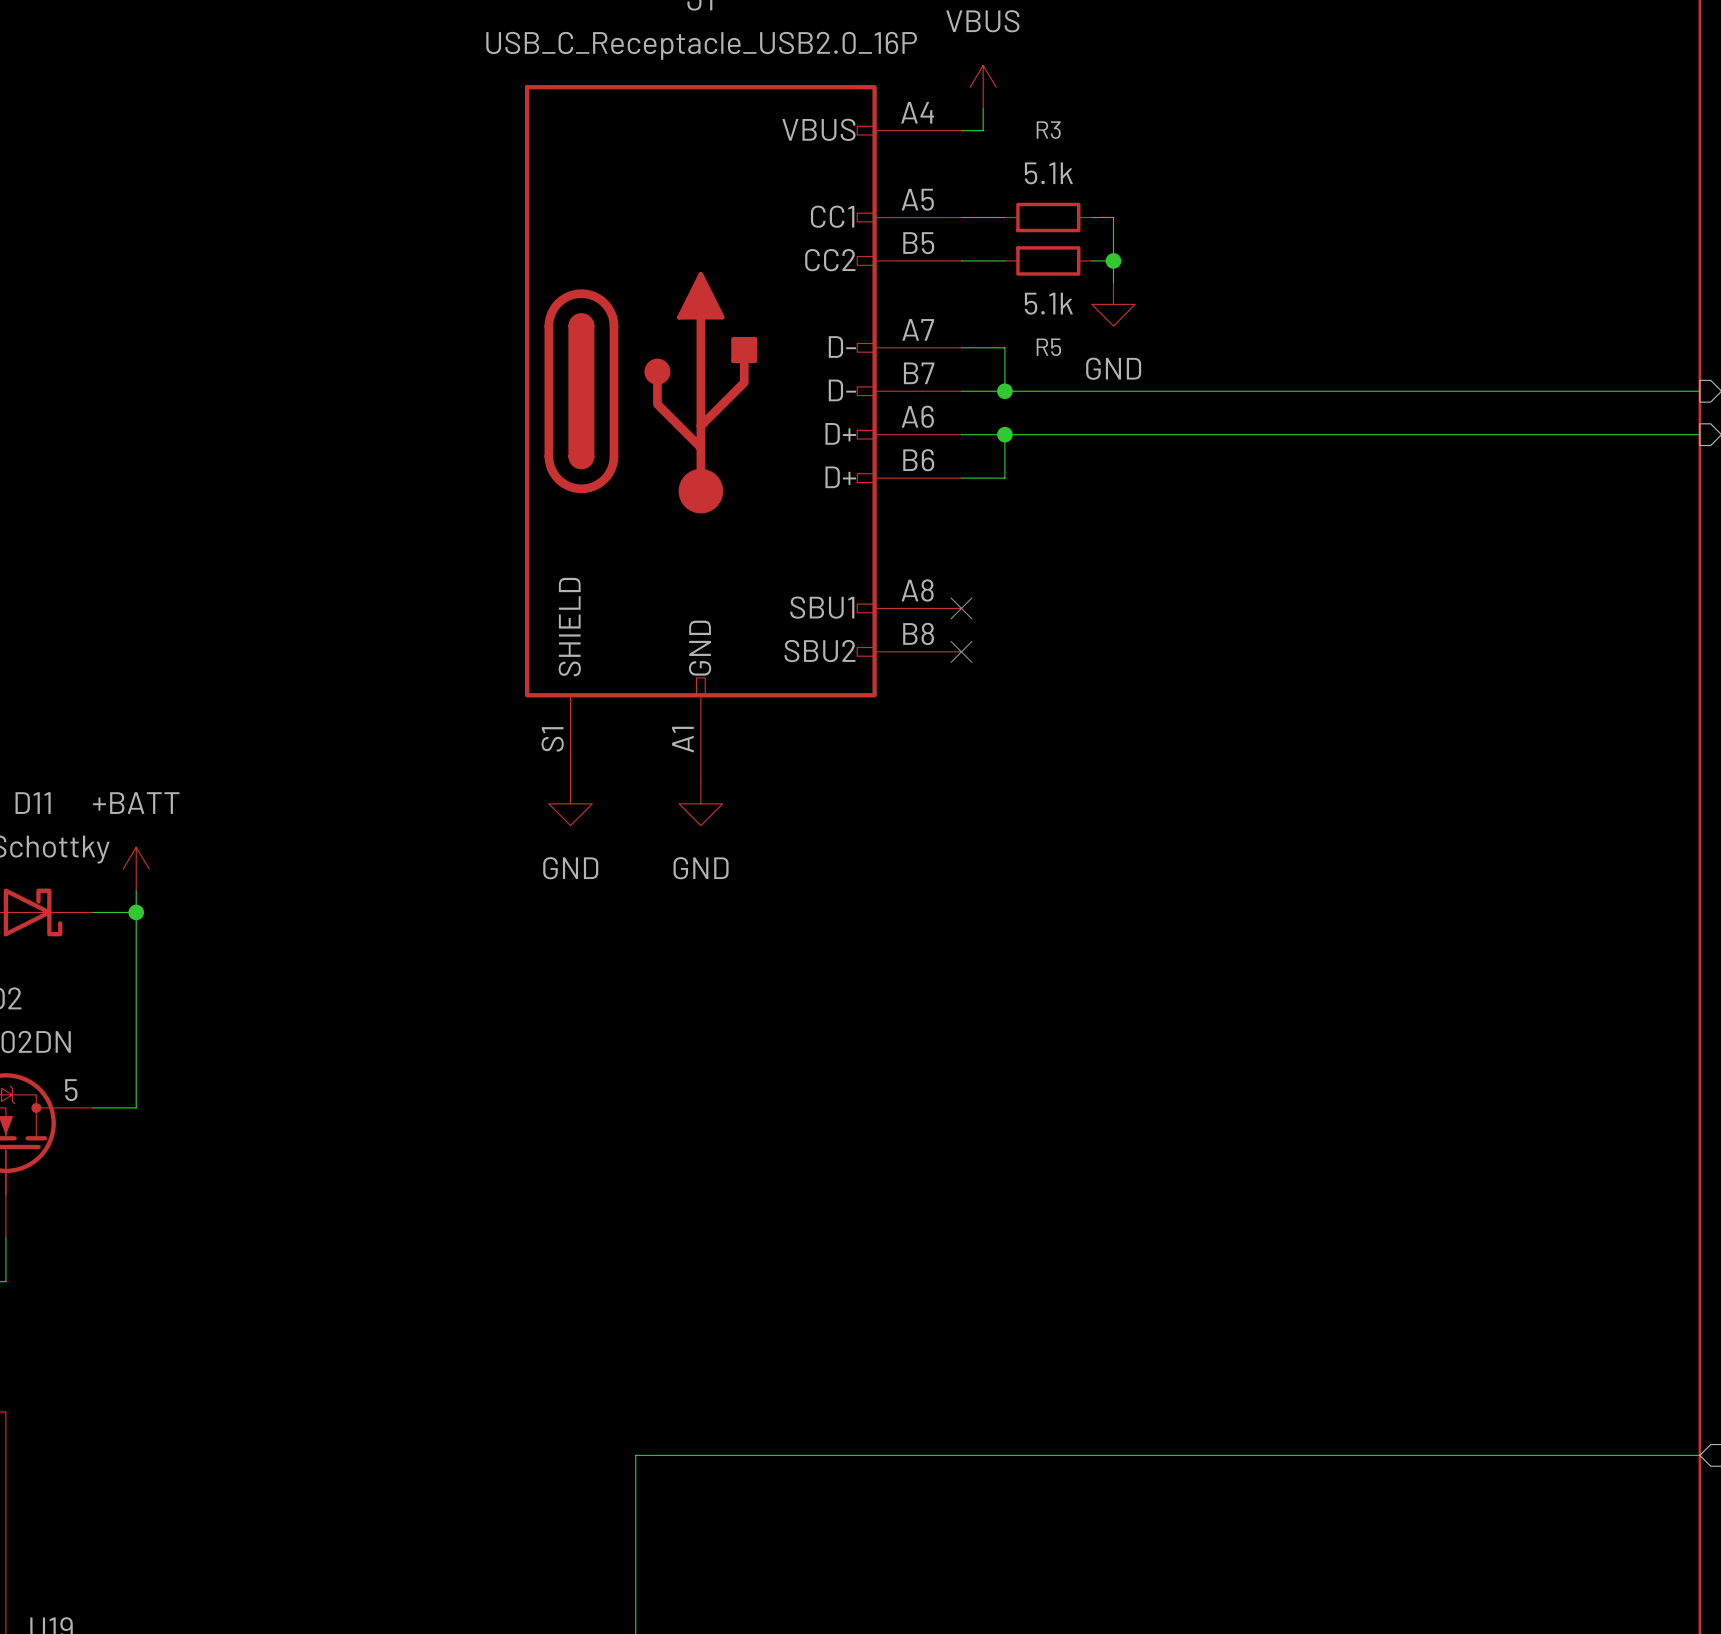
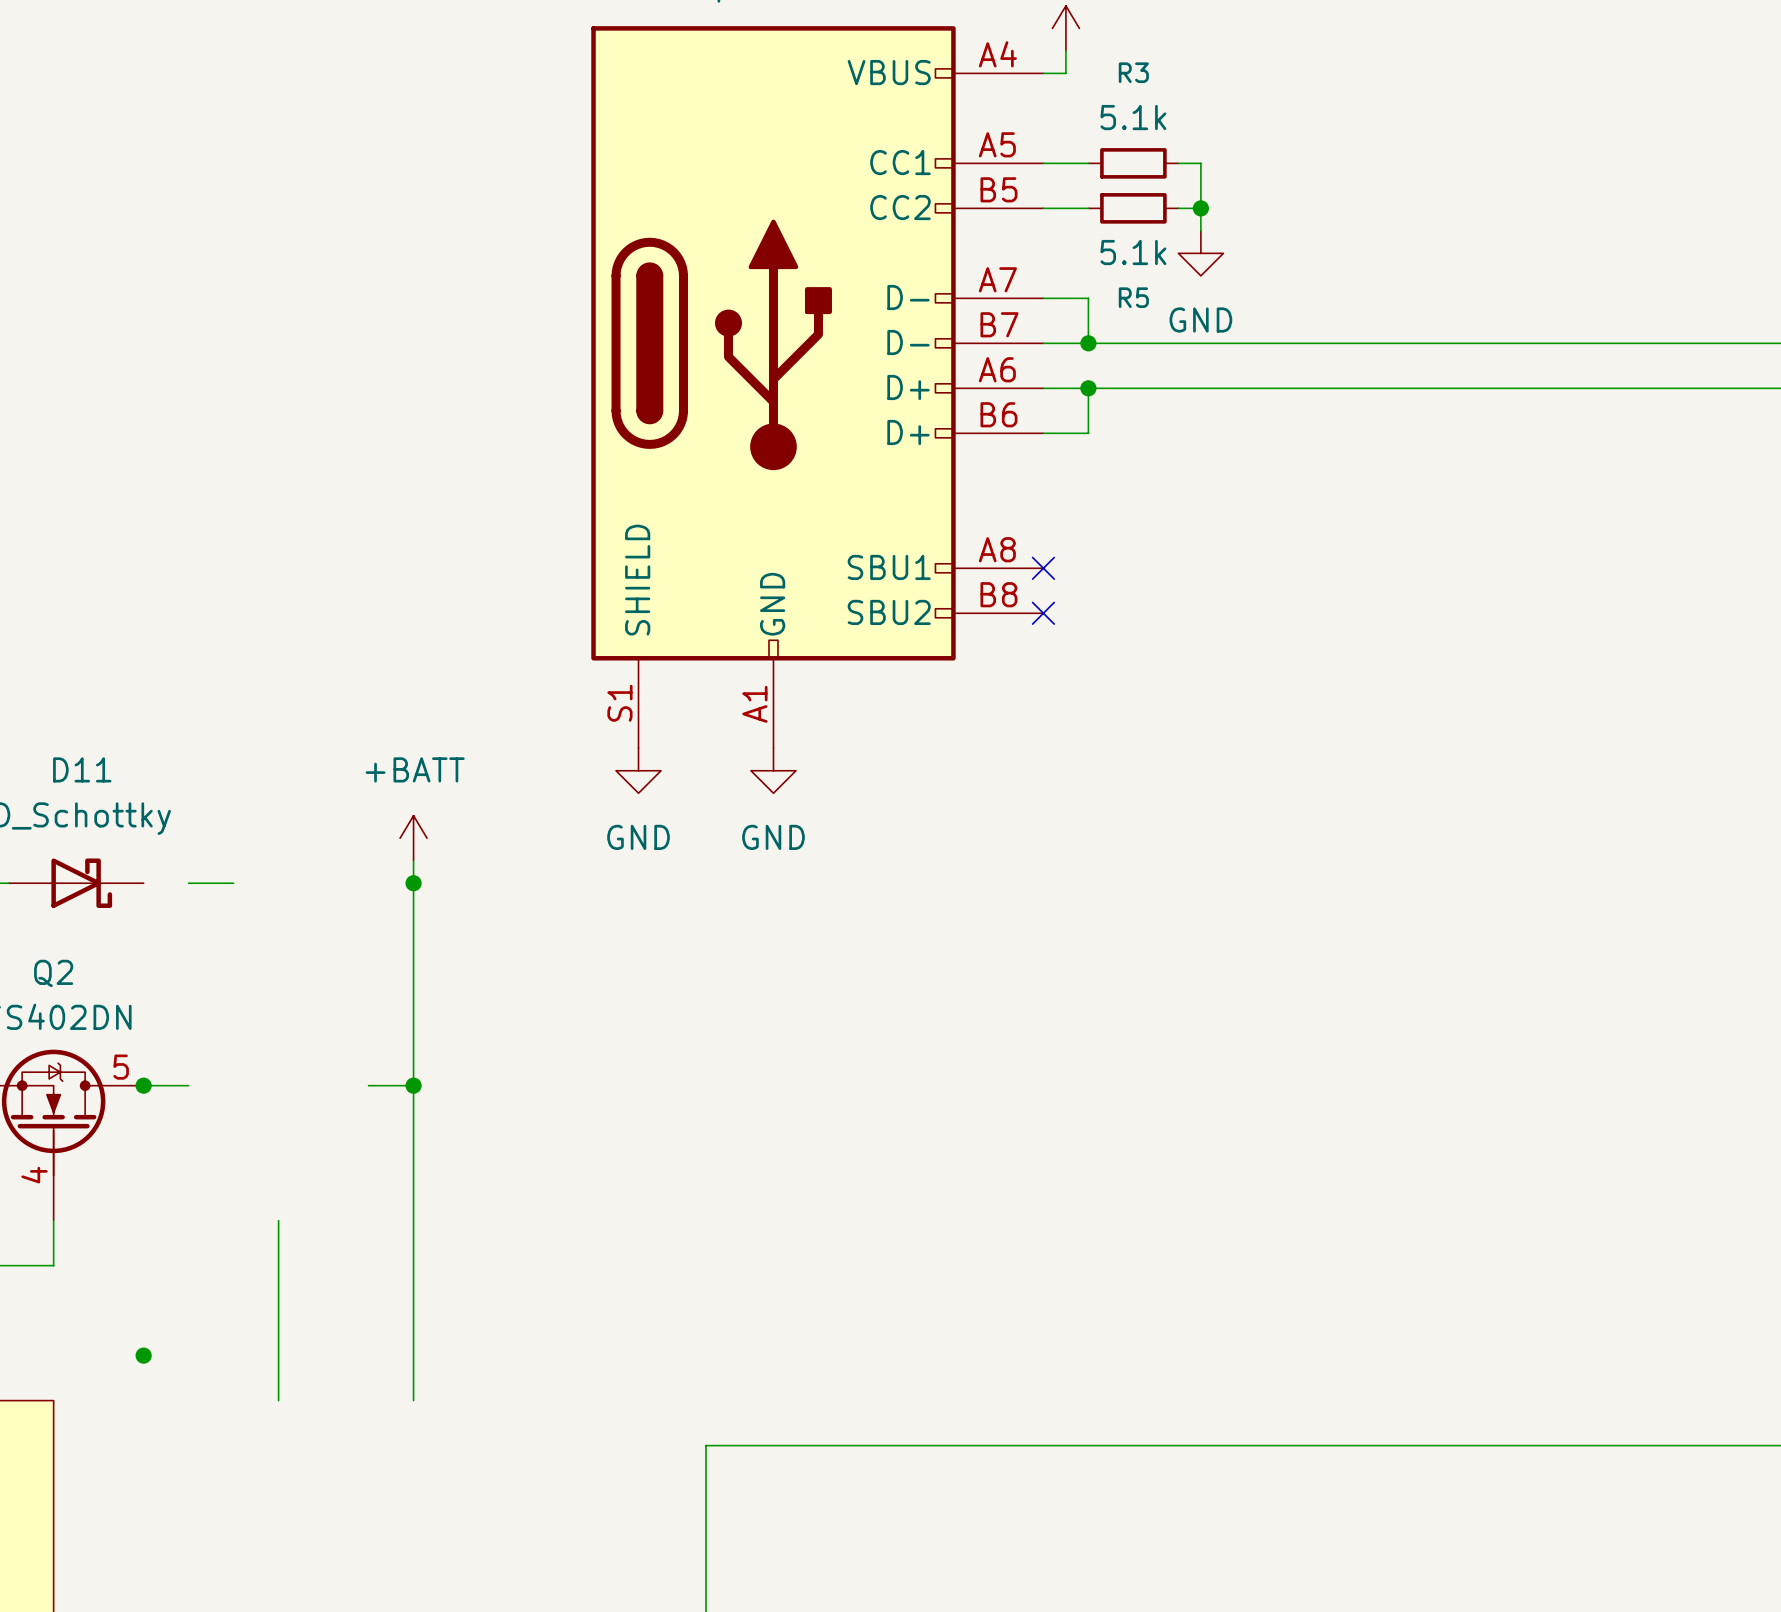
power symbol position: +BATT (136, 869) -> +BATT (413, 838)
wire: (136, 890) (136, 1107) -> none
wire: none -> (413, 860) (413, 1400)
wire: (92, 912) (136, 912) -> (233, 883) (188, 883)
junction: (136, 912) -> none
junction: none -> (413, 883)
junction: none -> (143, 1085)
wire: none -> (368, 1085) (413, 1085)
junction: none -> (413, 1085)
wire: none -> (278, 1220) (278, 1400)
junction: none -> (143, 1355)

